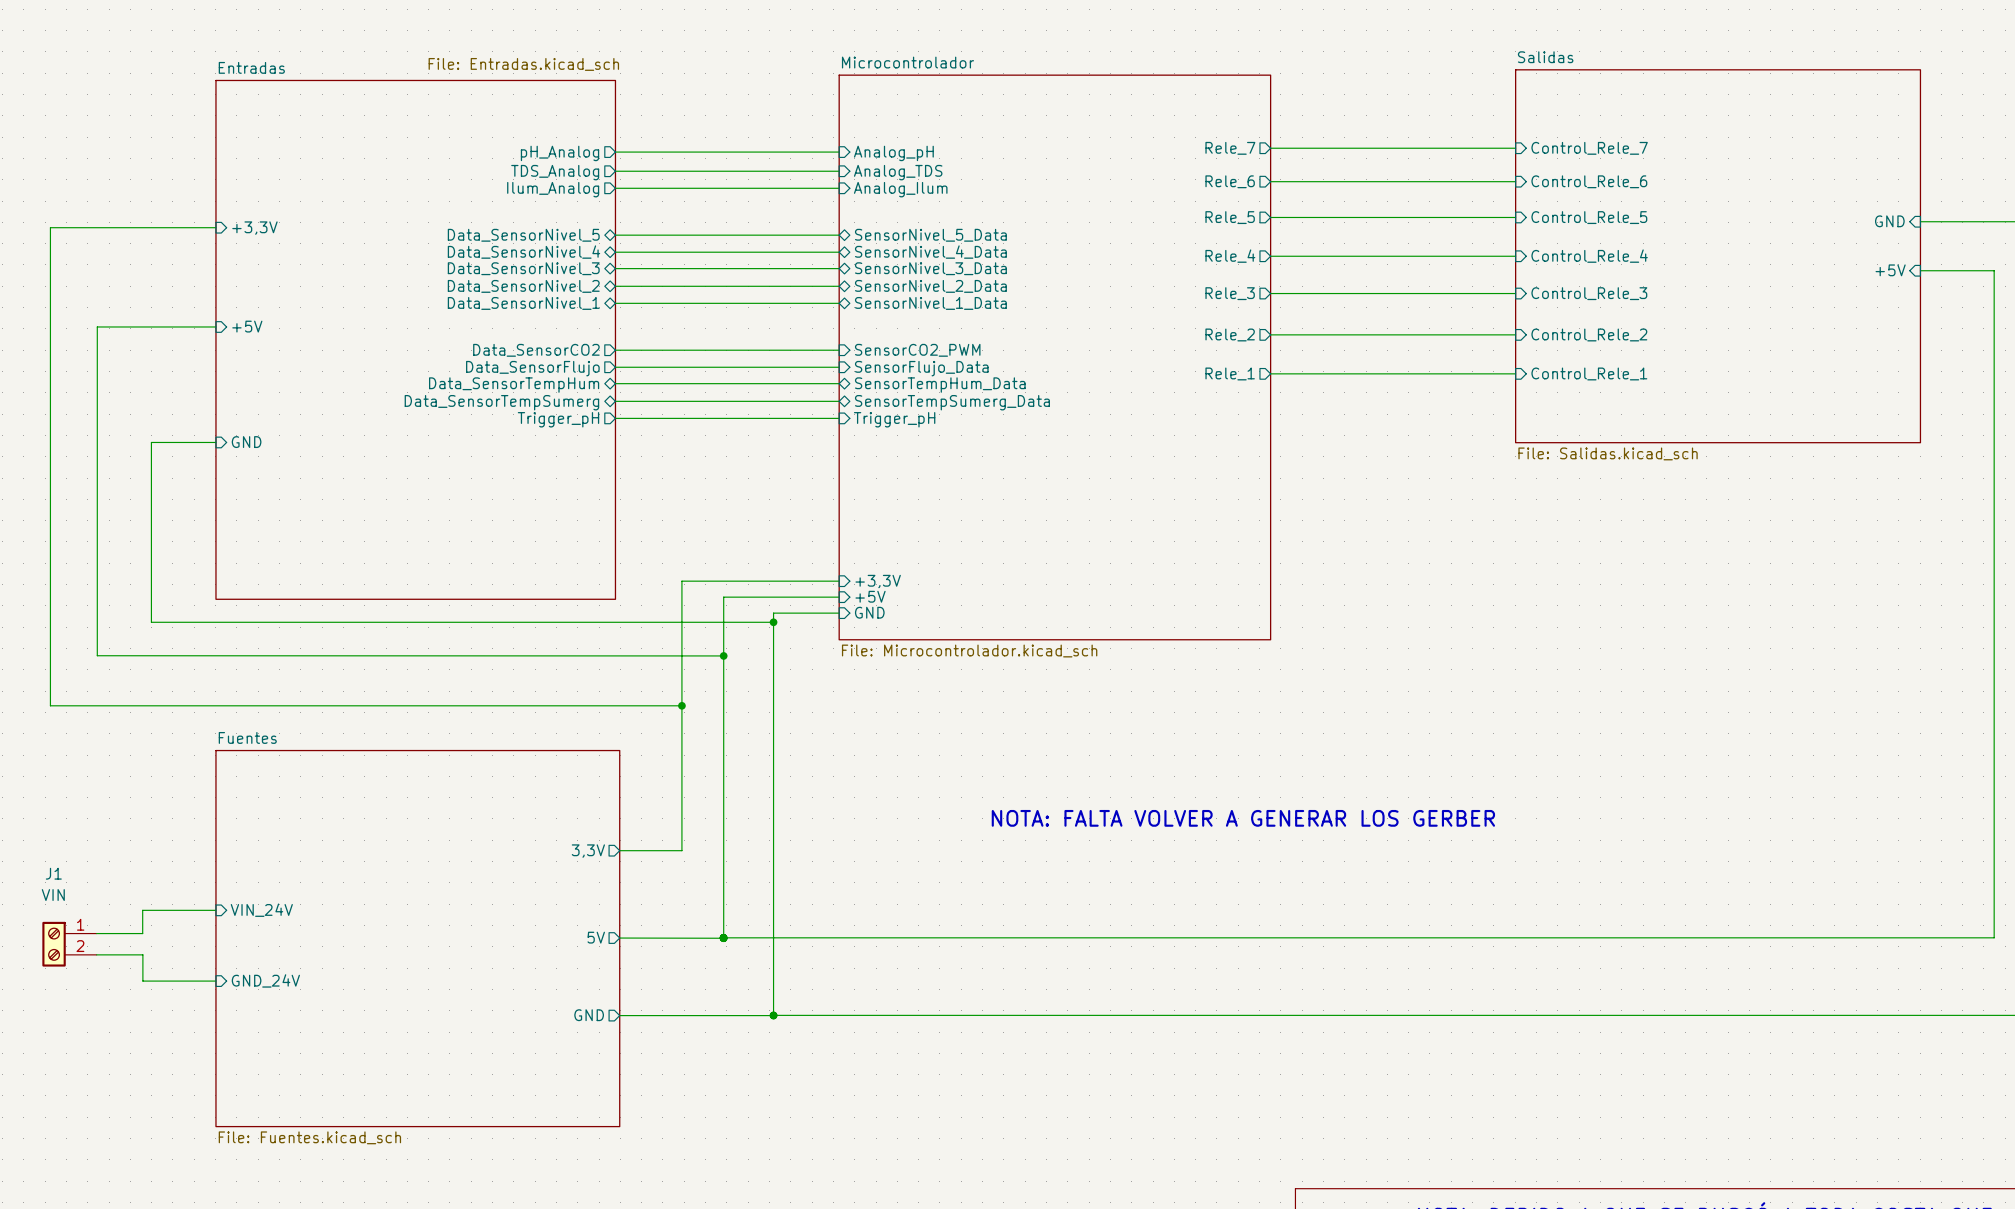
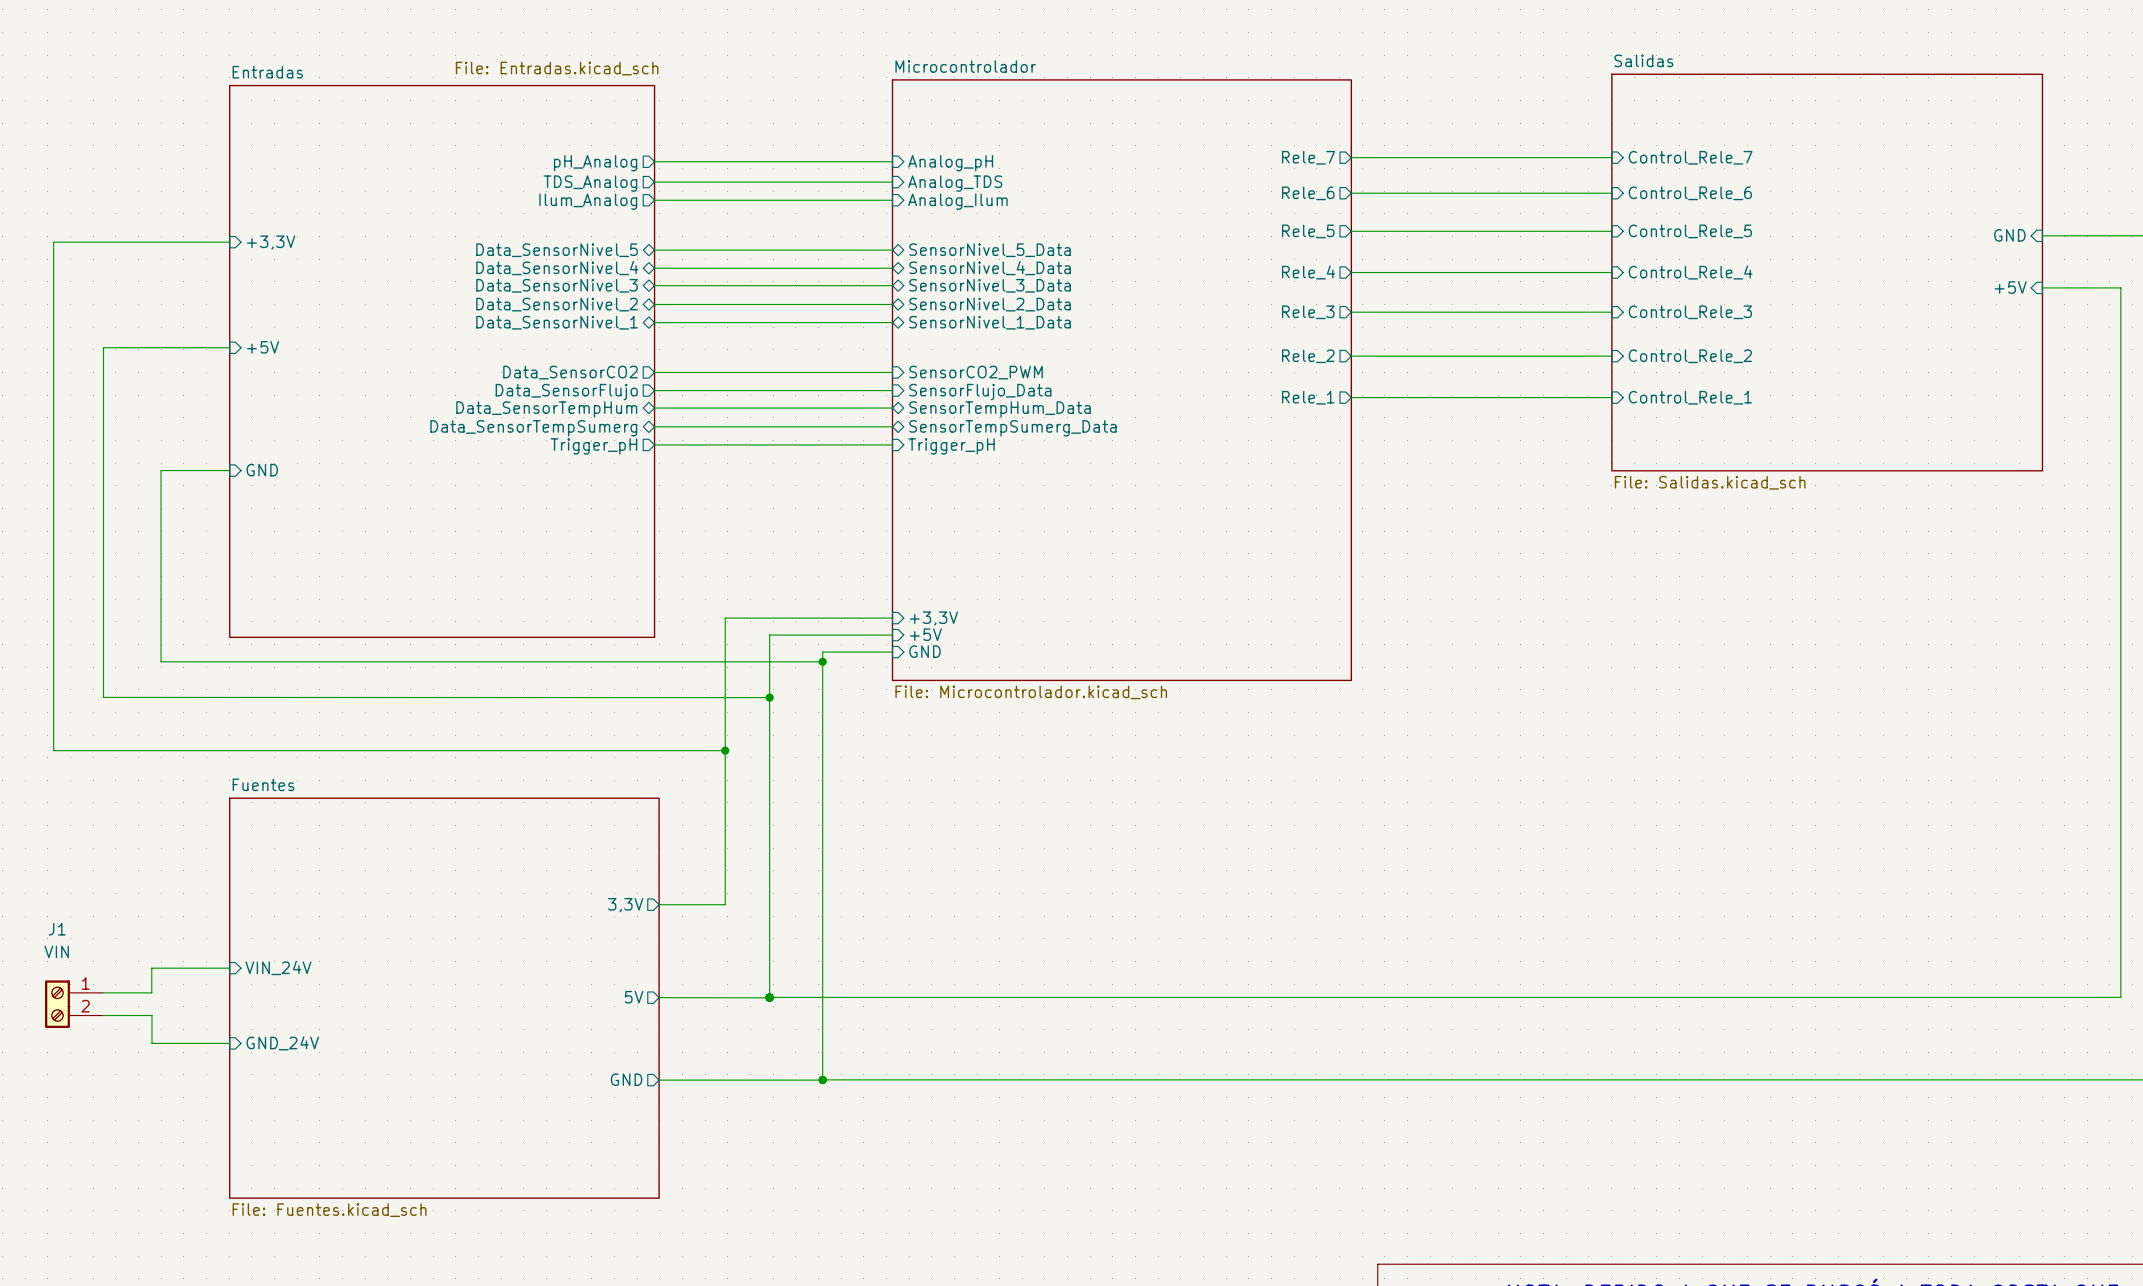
text: NOTA: FALTA VOLVER A GENERAR LOS GERBER (1243, 818) -> none

